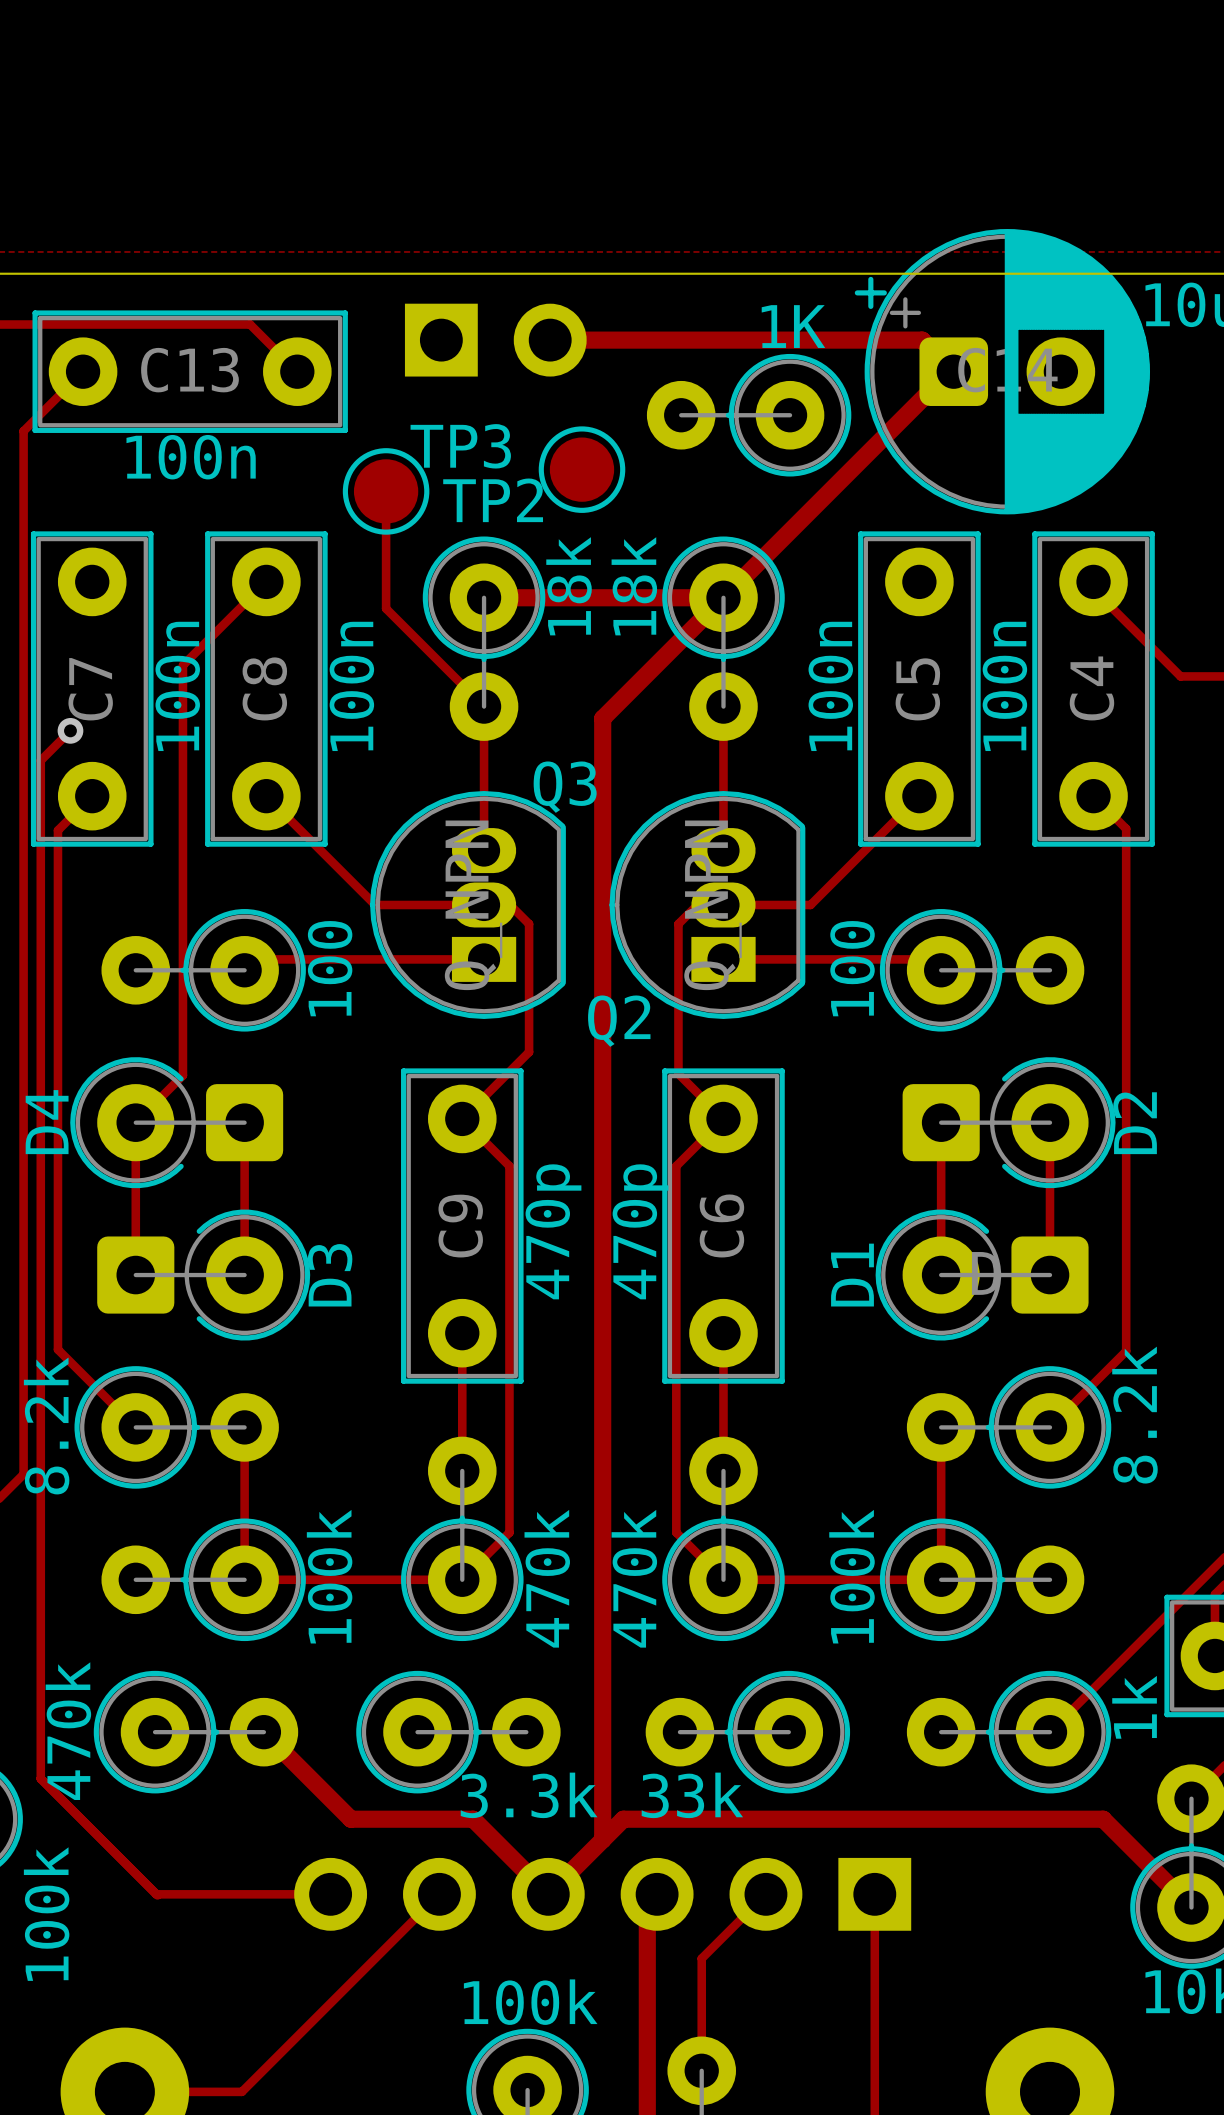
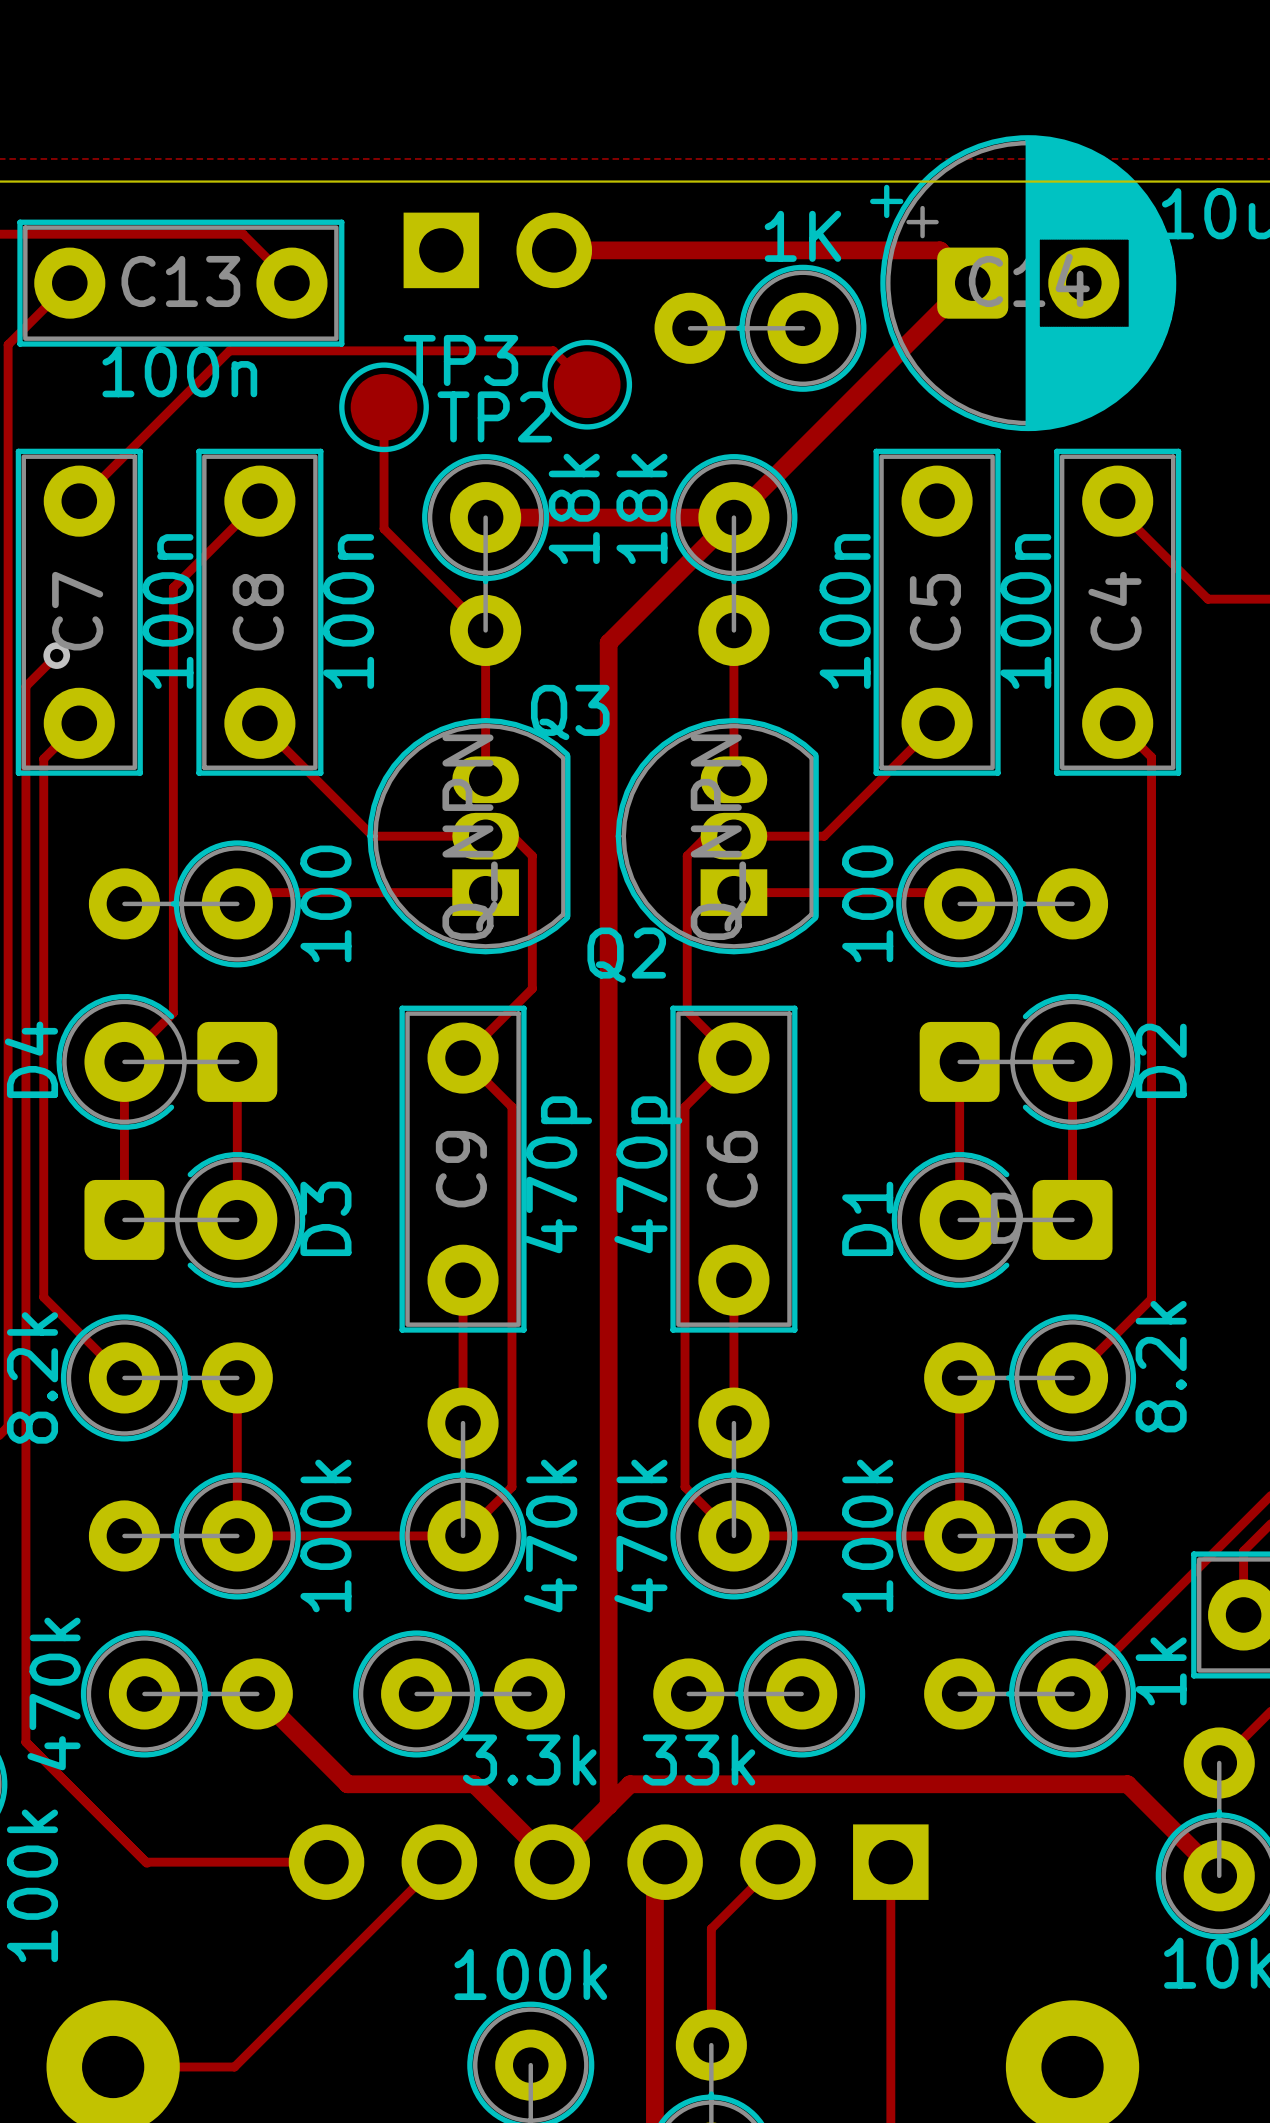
track: none -> (587, 384) (553, 350) (229, 350) (79, 501)

